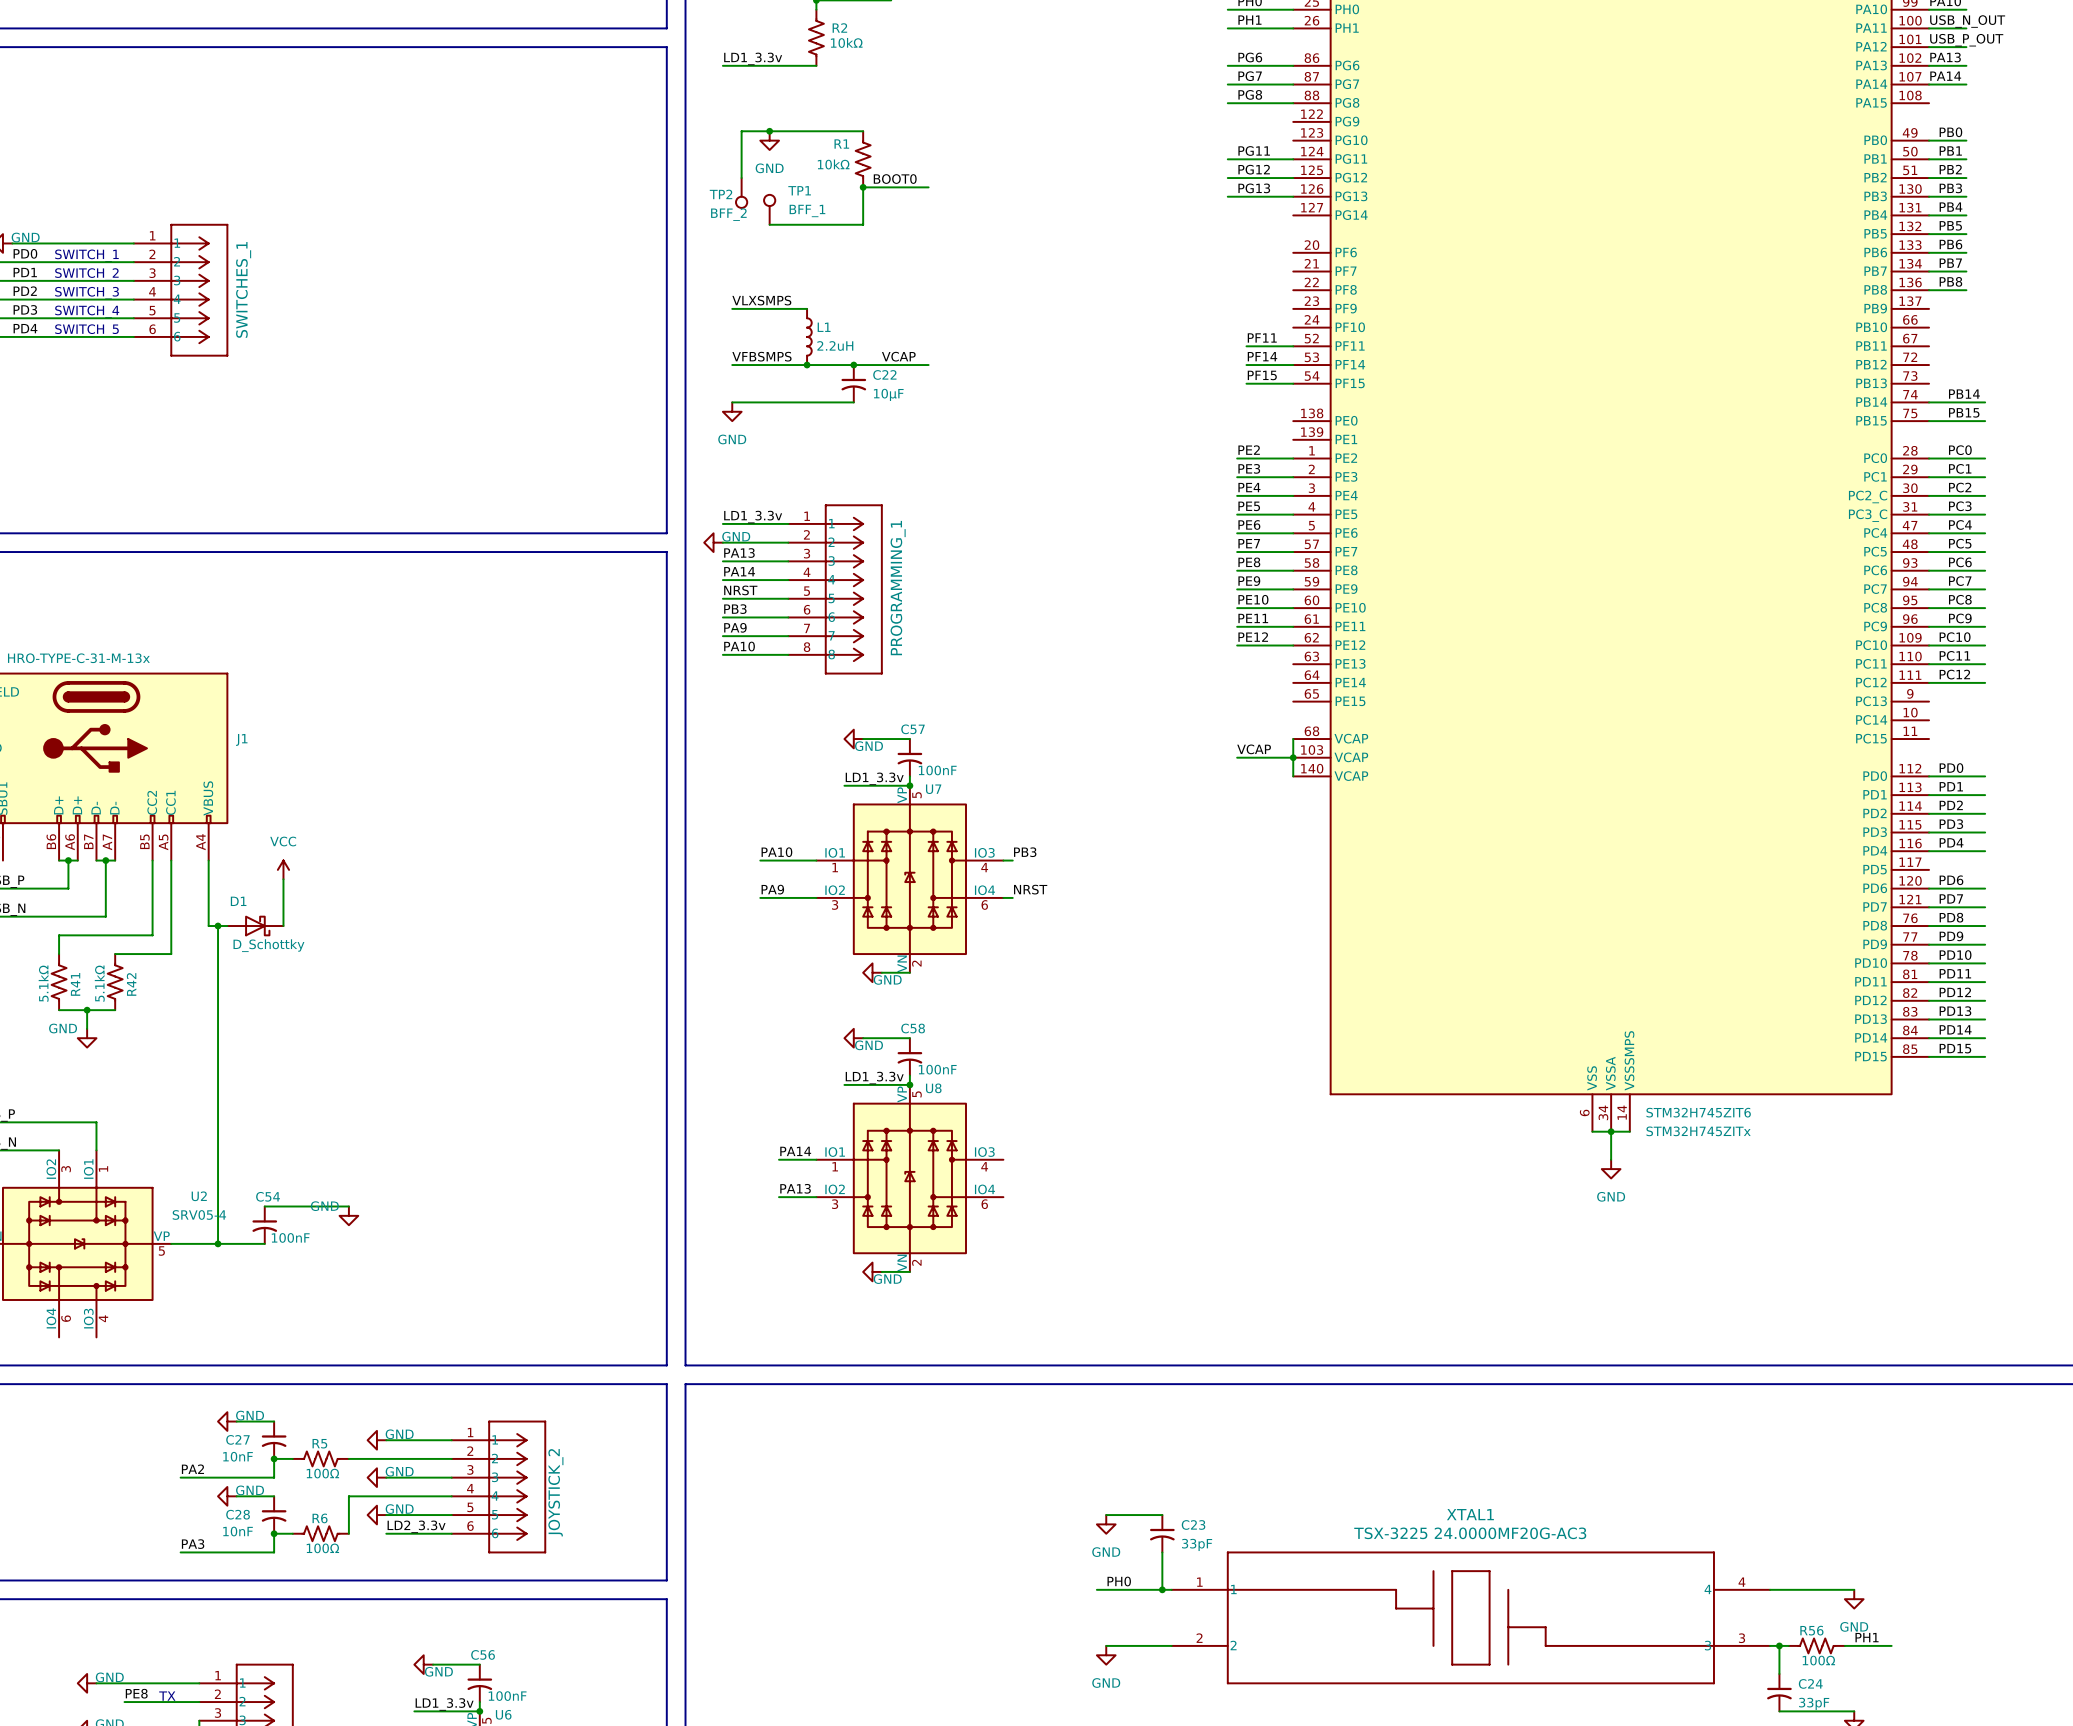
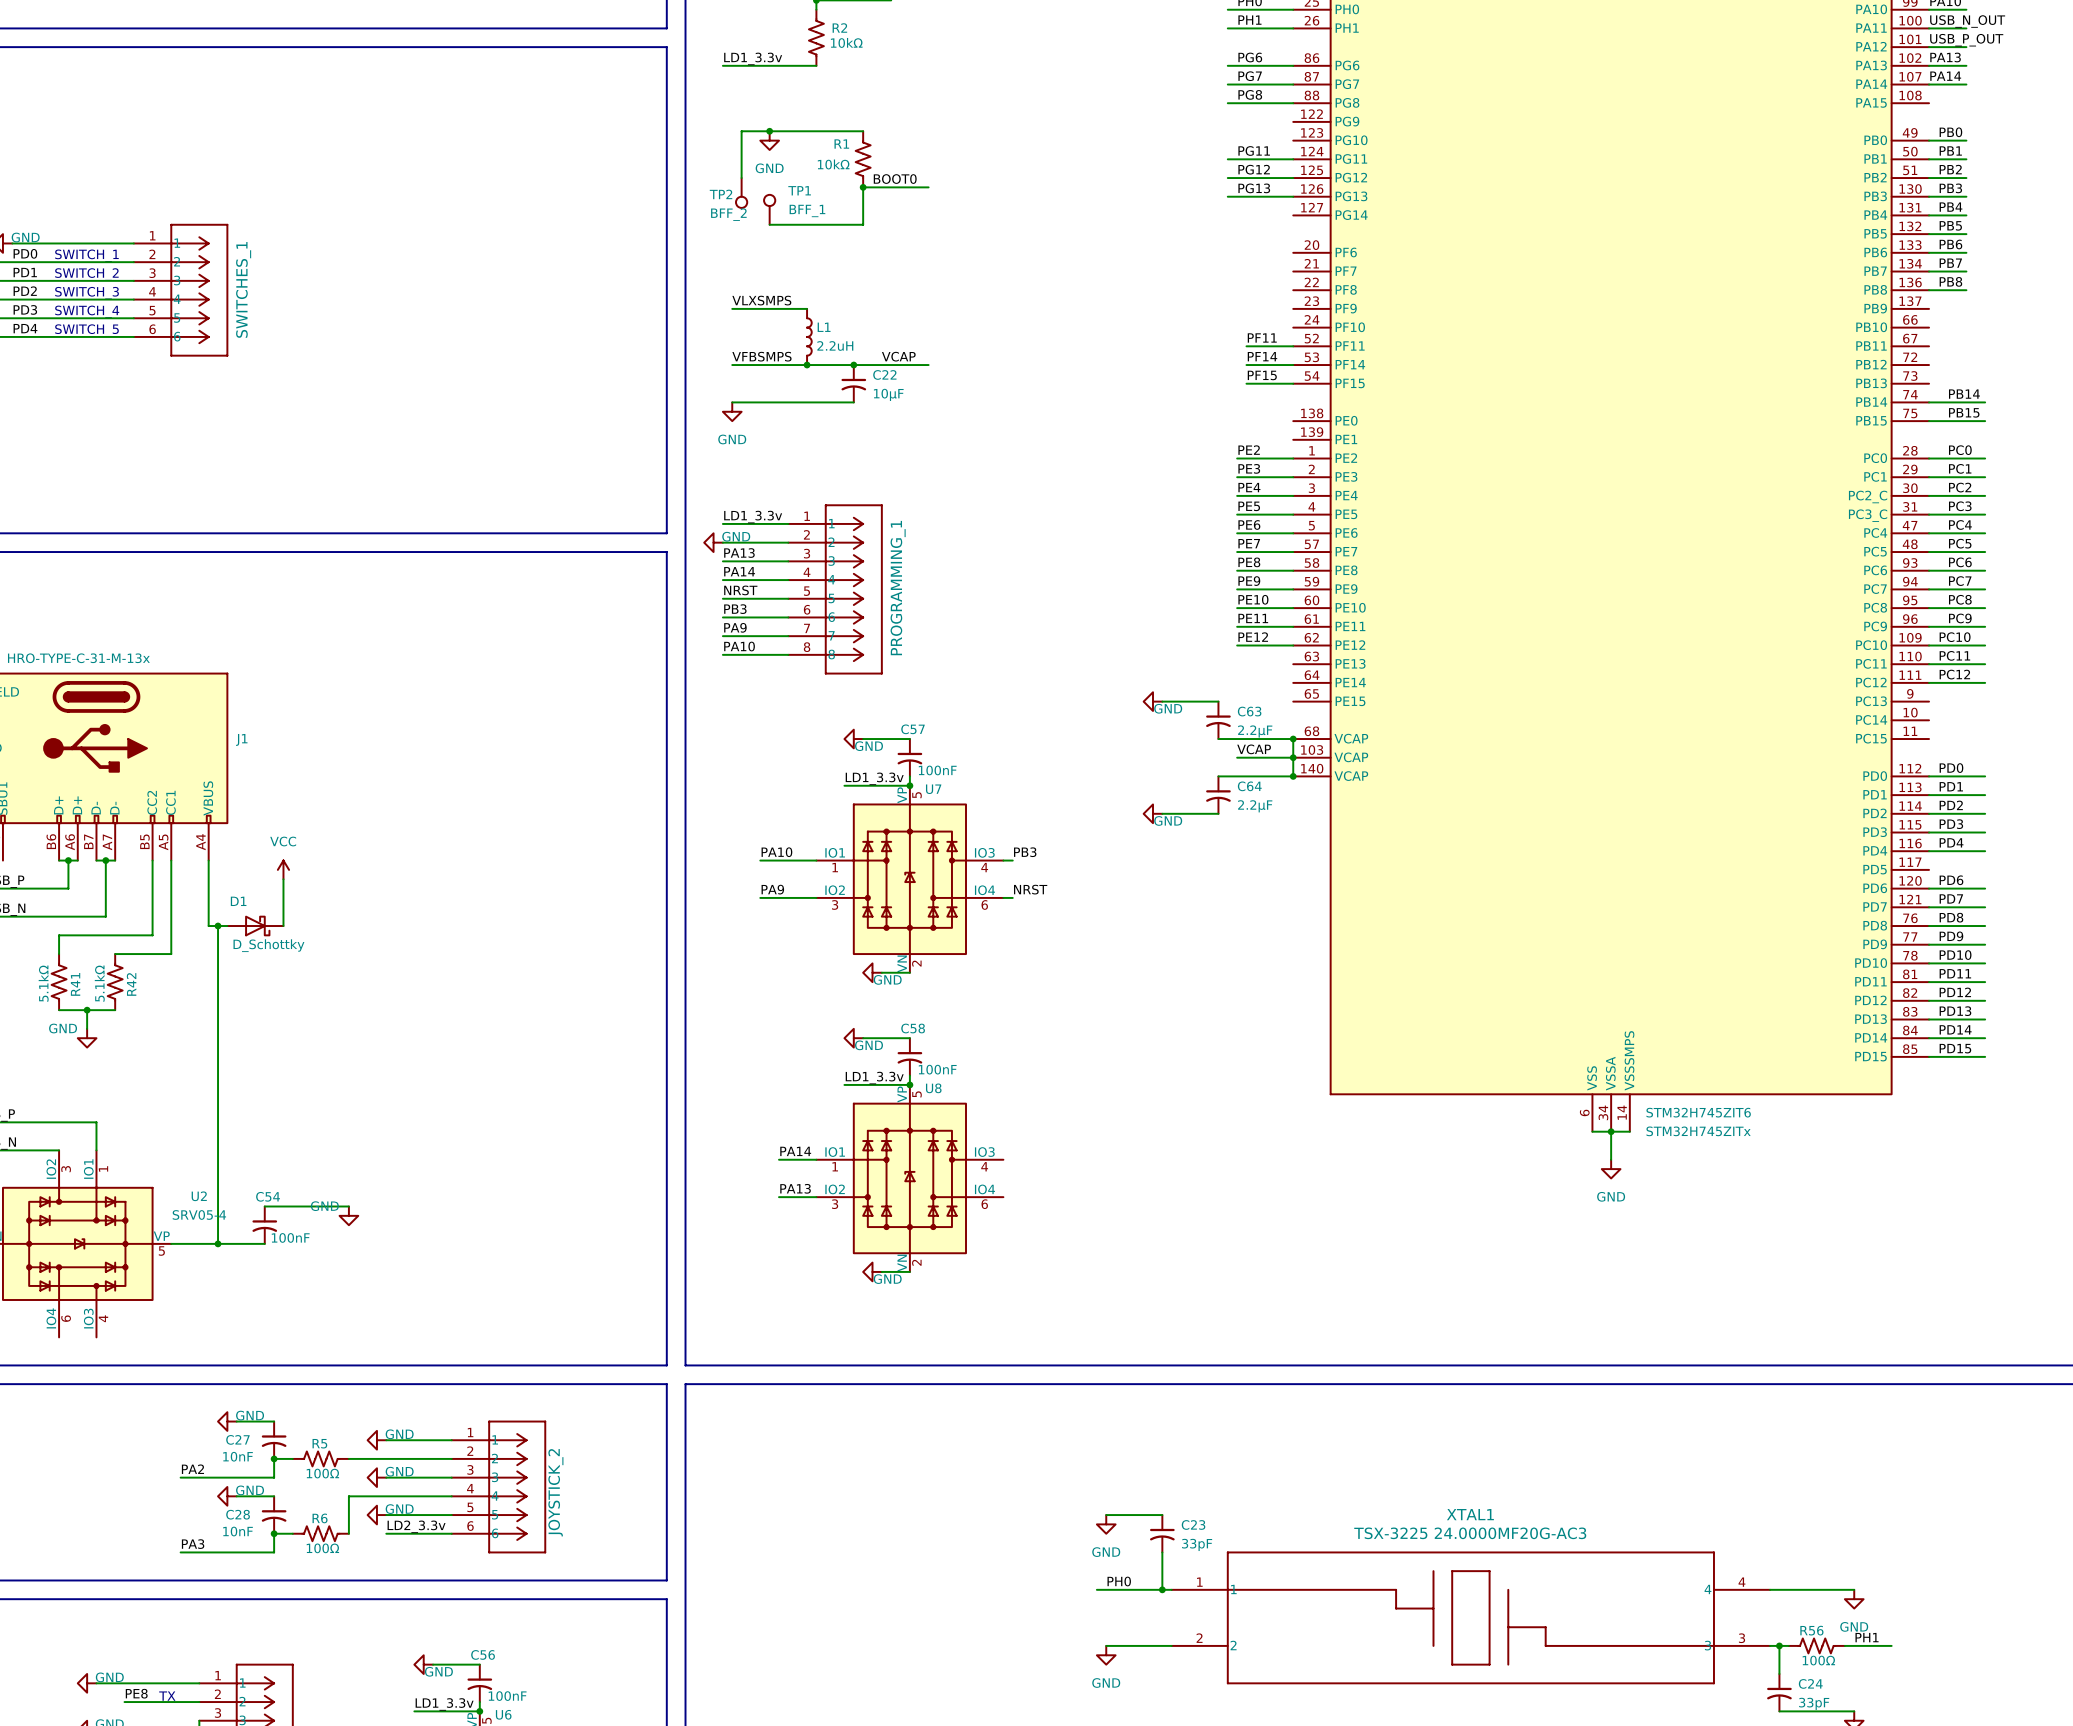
power symbol: none -> GND (1153, 701)
wire: none -> (1162, 701) (1218, 701)
C63: none -> 2.2µF (1218, 720)
wire: none -> (1218, 739) (1293, 739)
junction: none -> (1293, 739)
wire: none -> (1218, 776) (1293, 776)
junction: none -> (1293, 776)
C64: none -> 2.2µF (1218, 795)
power symbol: none -> GND (1153, 813)
wire: none -> (1162, 813) (1218, 813)

